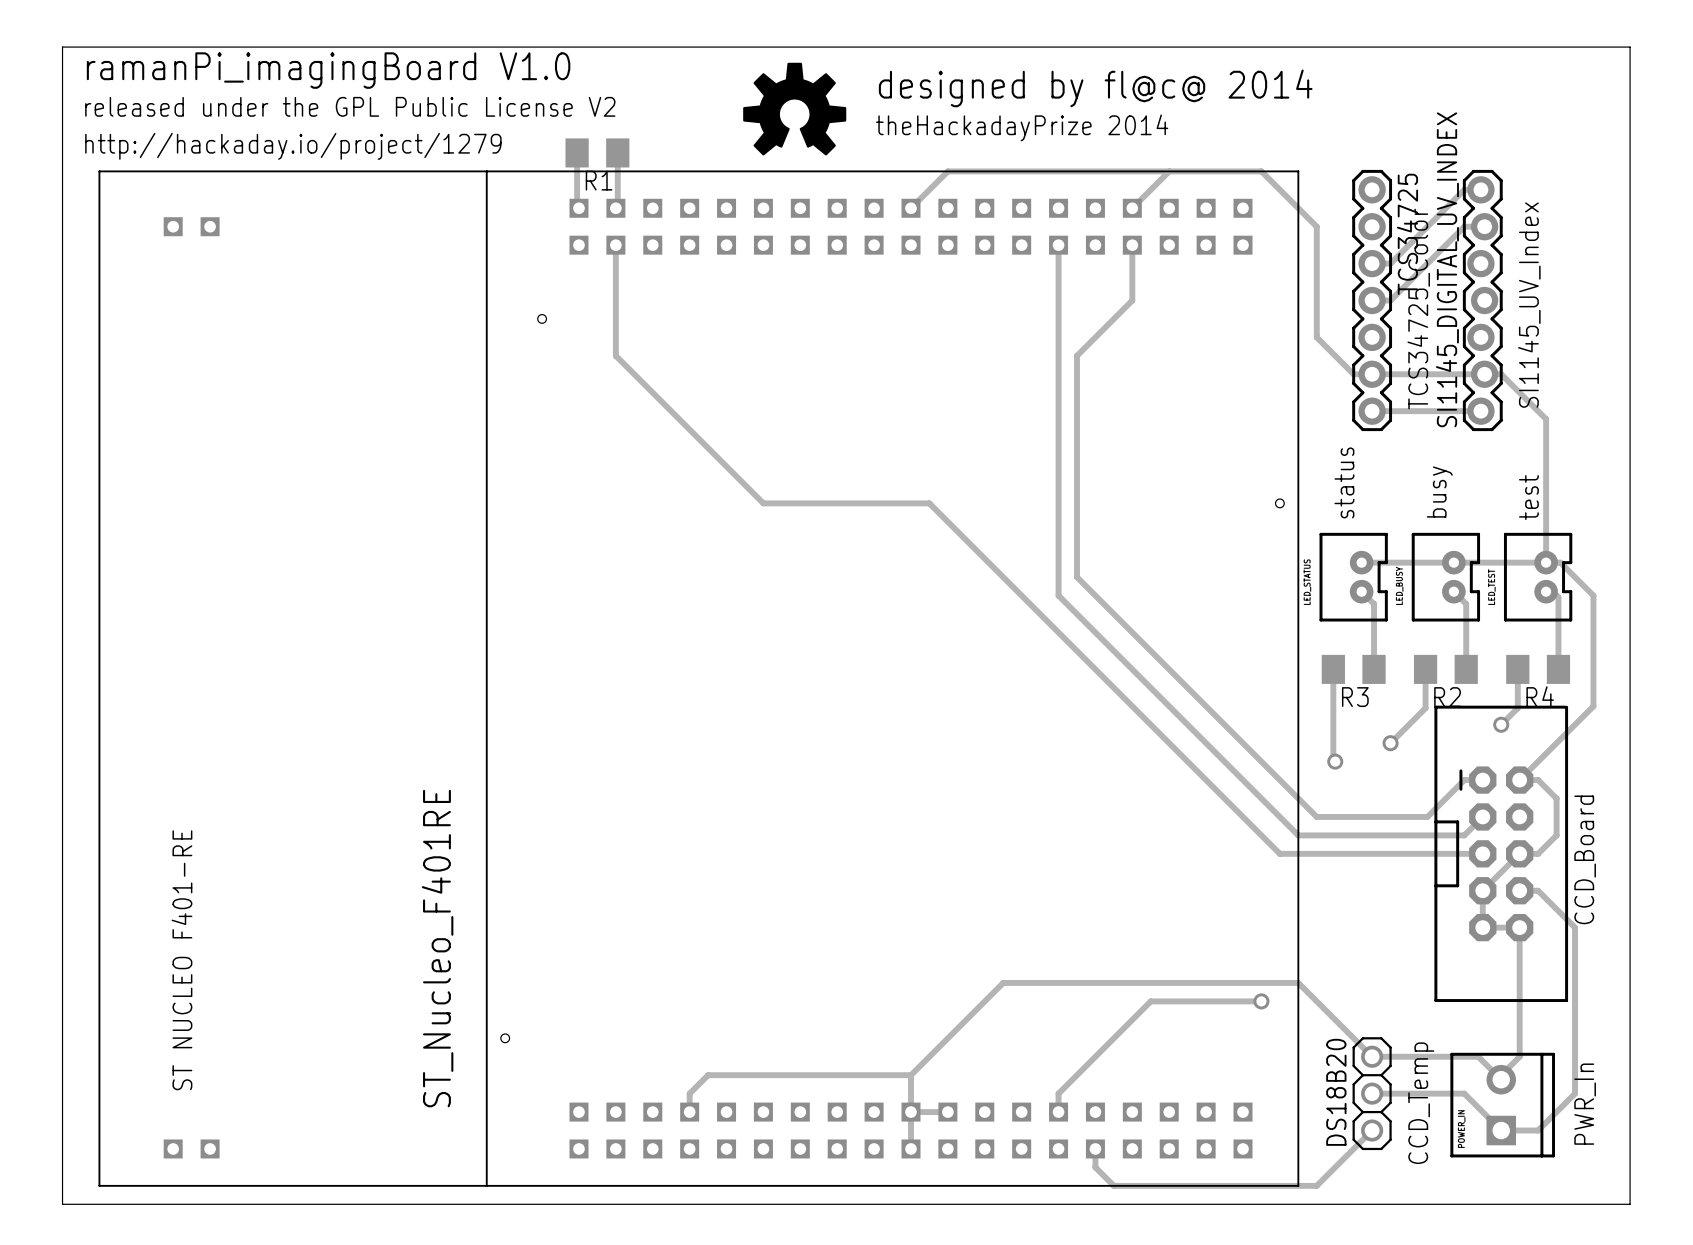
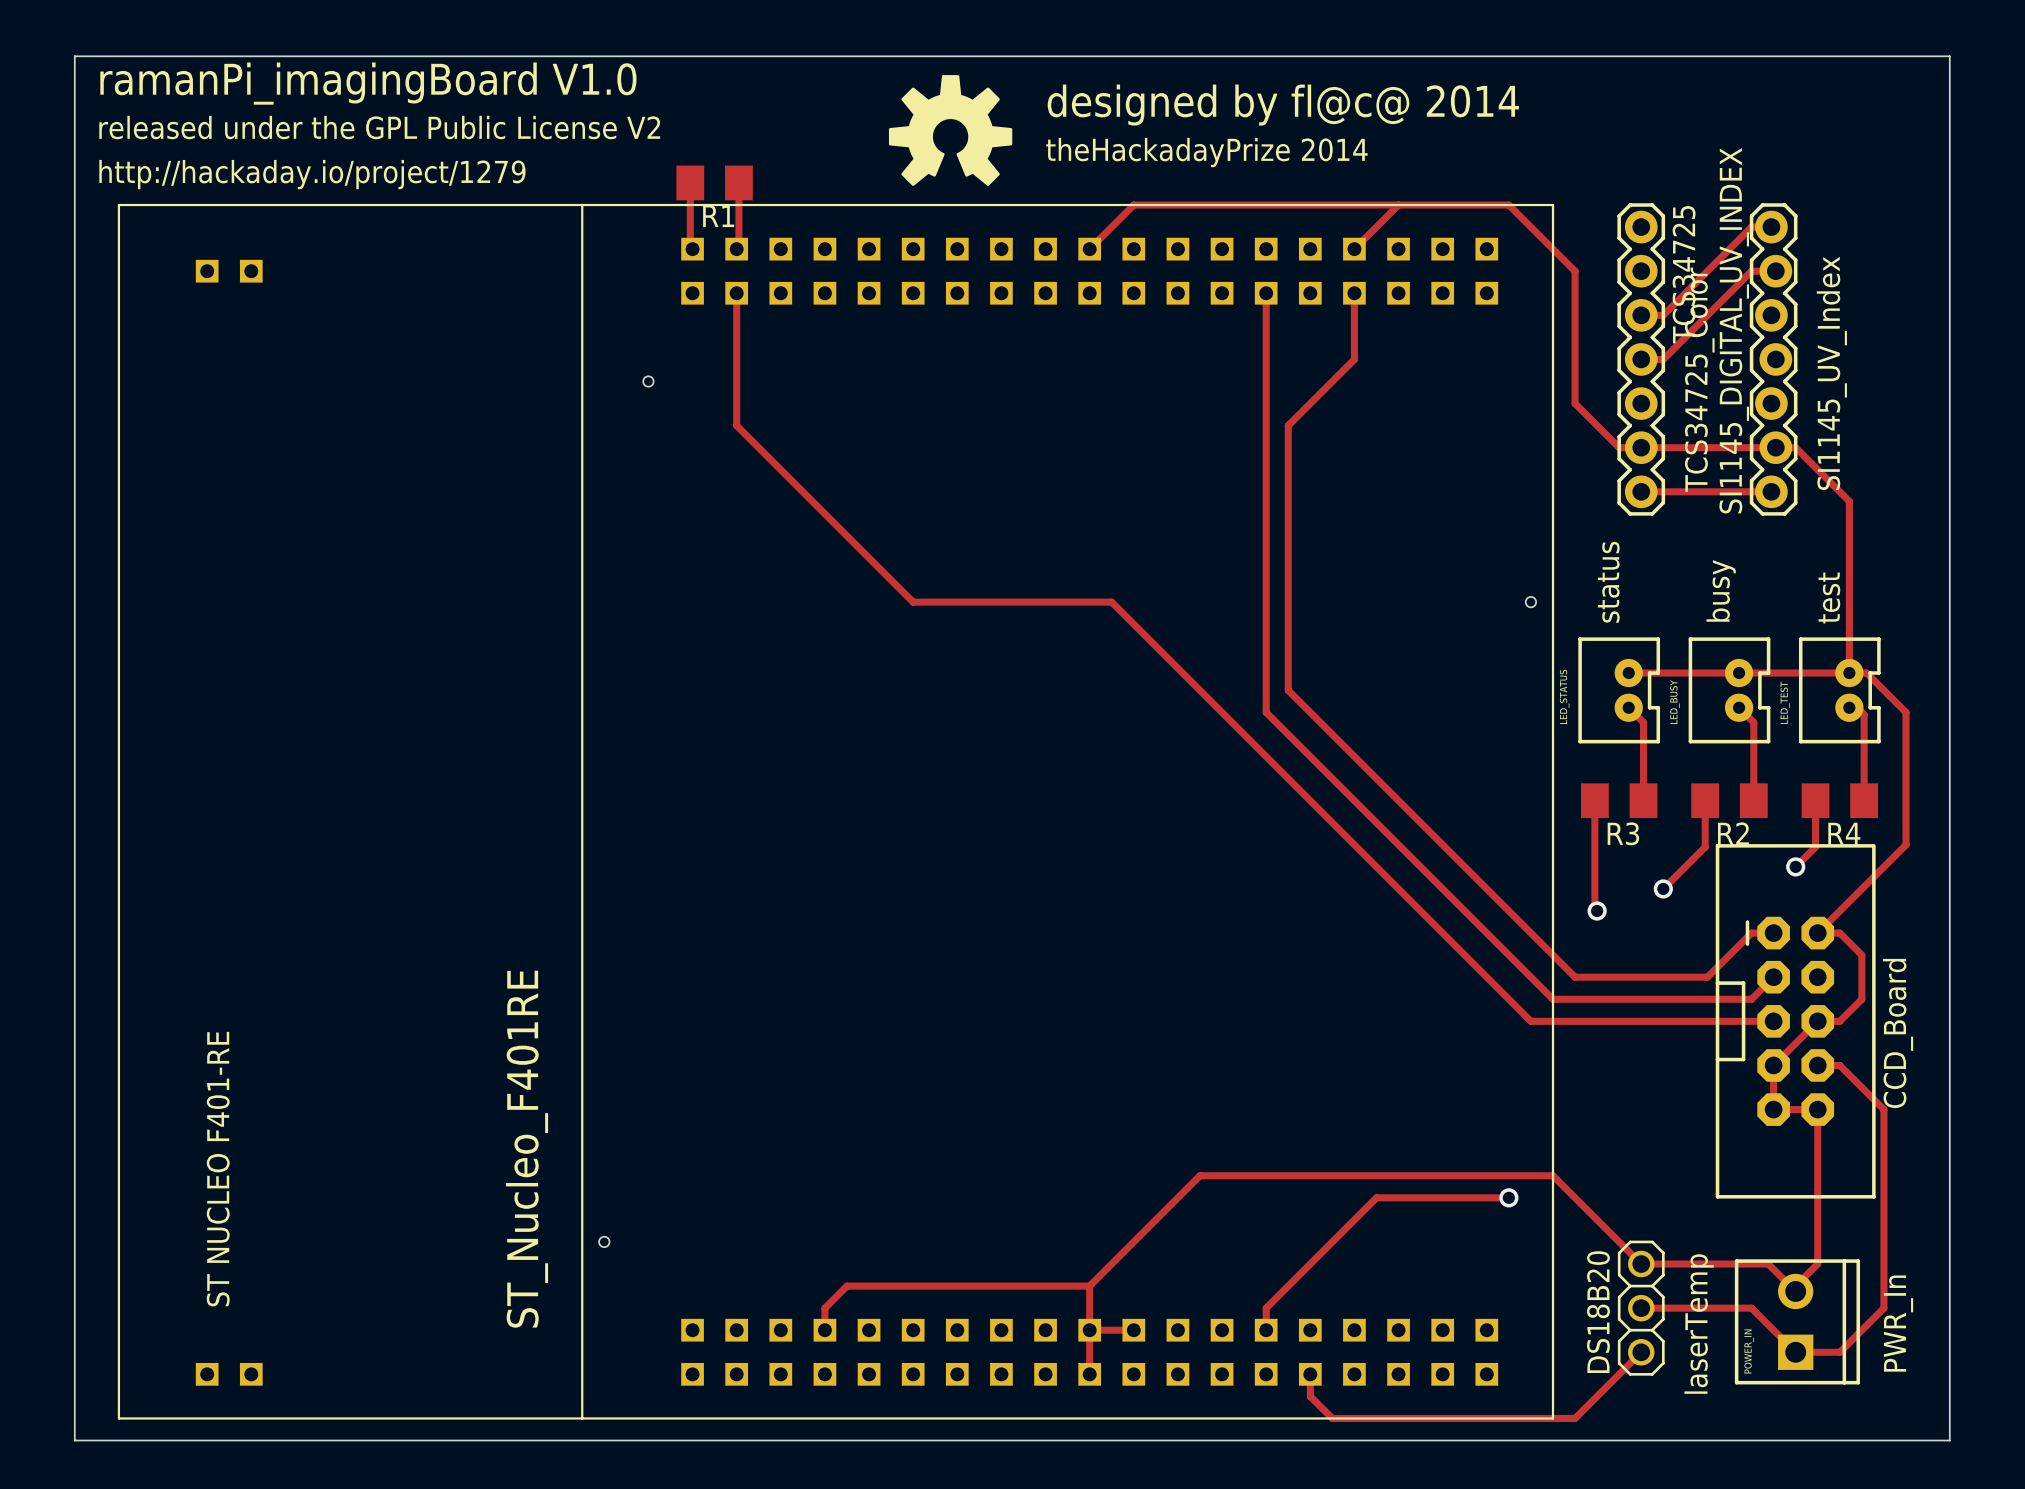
text: CCD_Temp (1421, 1103) -> laserTemp (1699, 1324)

